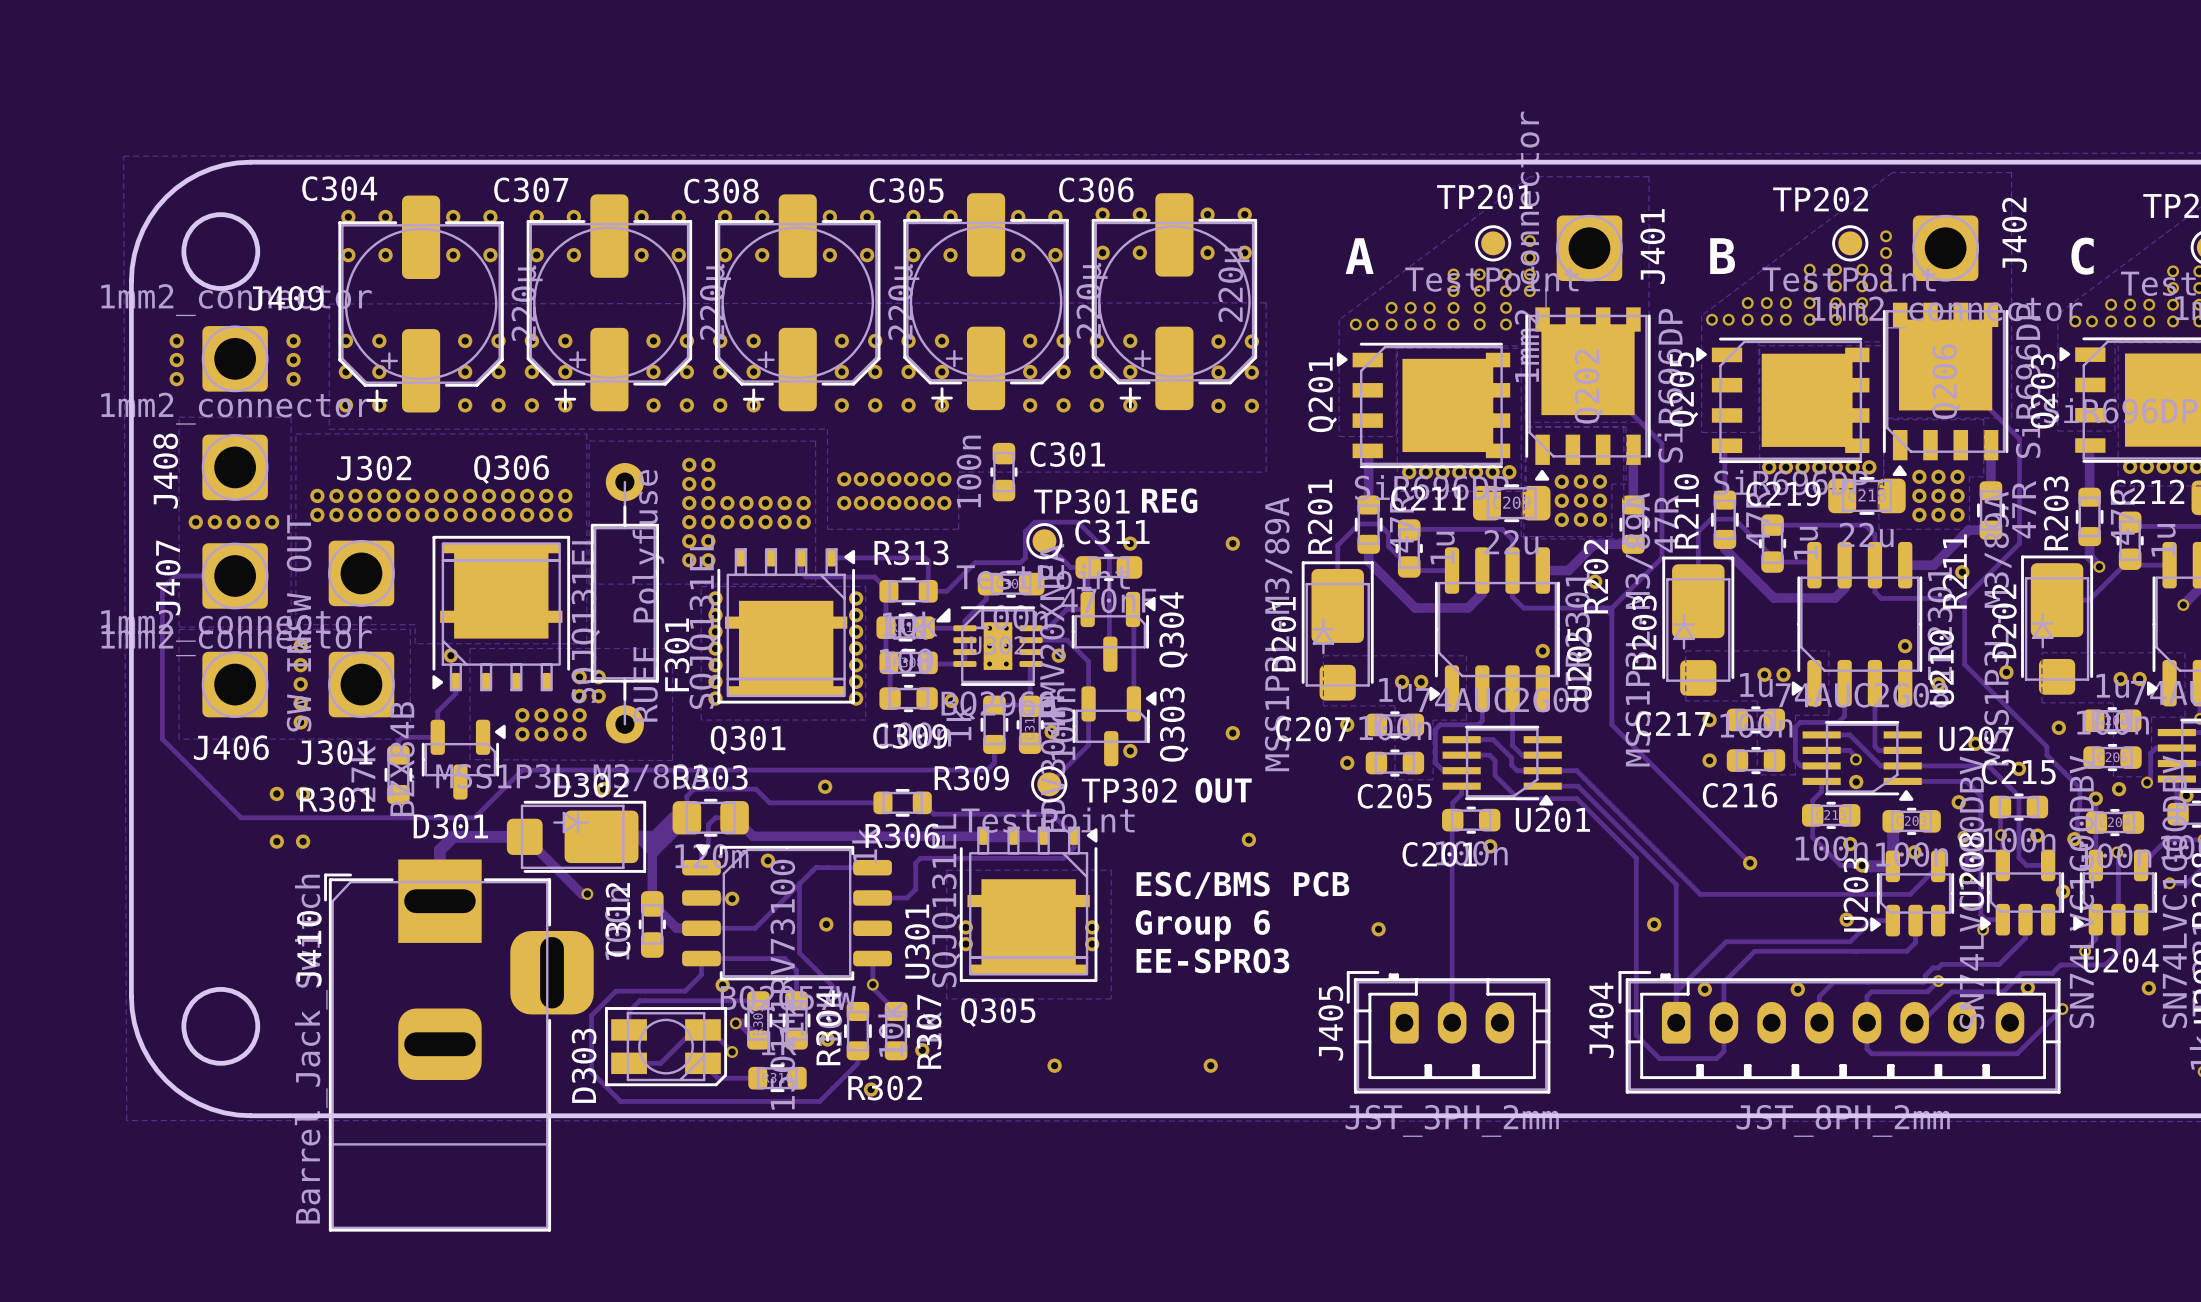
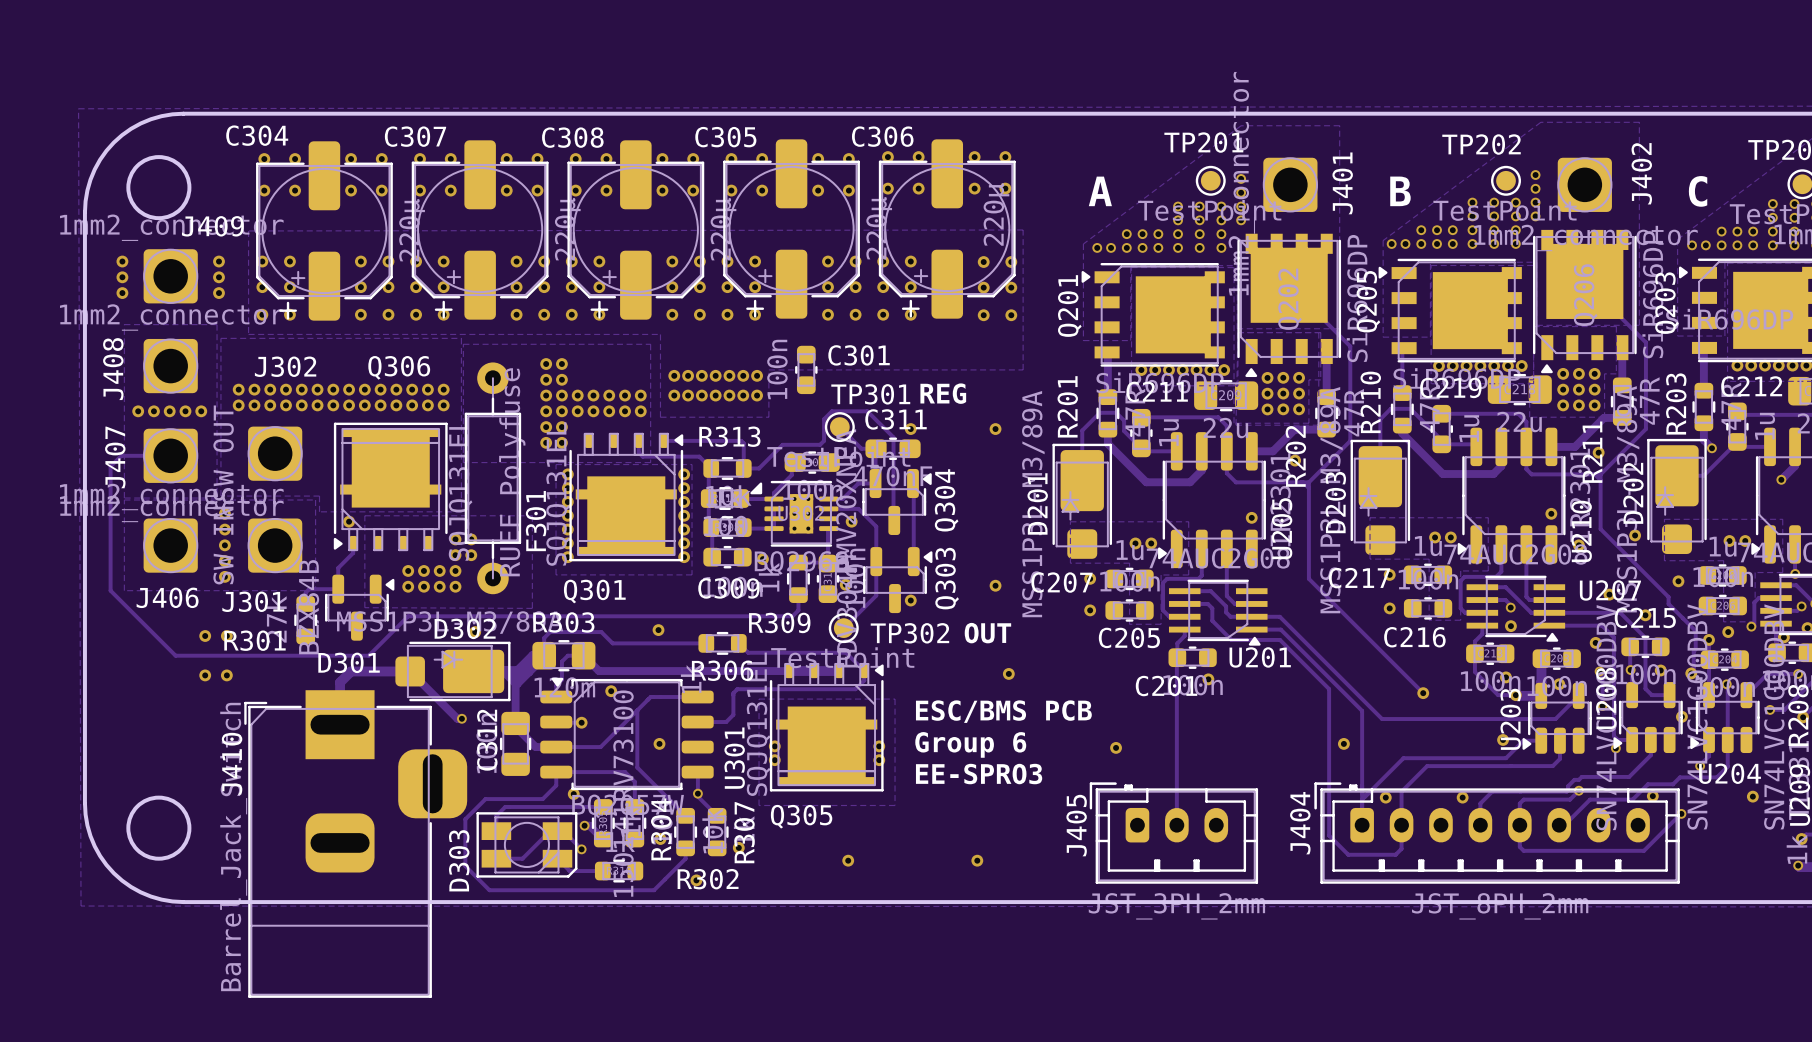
C312 footprint: [638, 891, 666, 958] -> [499, 711, 532, 776]

